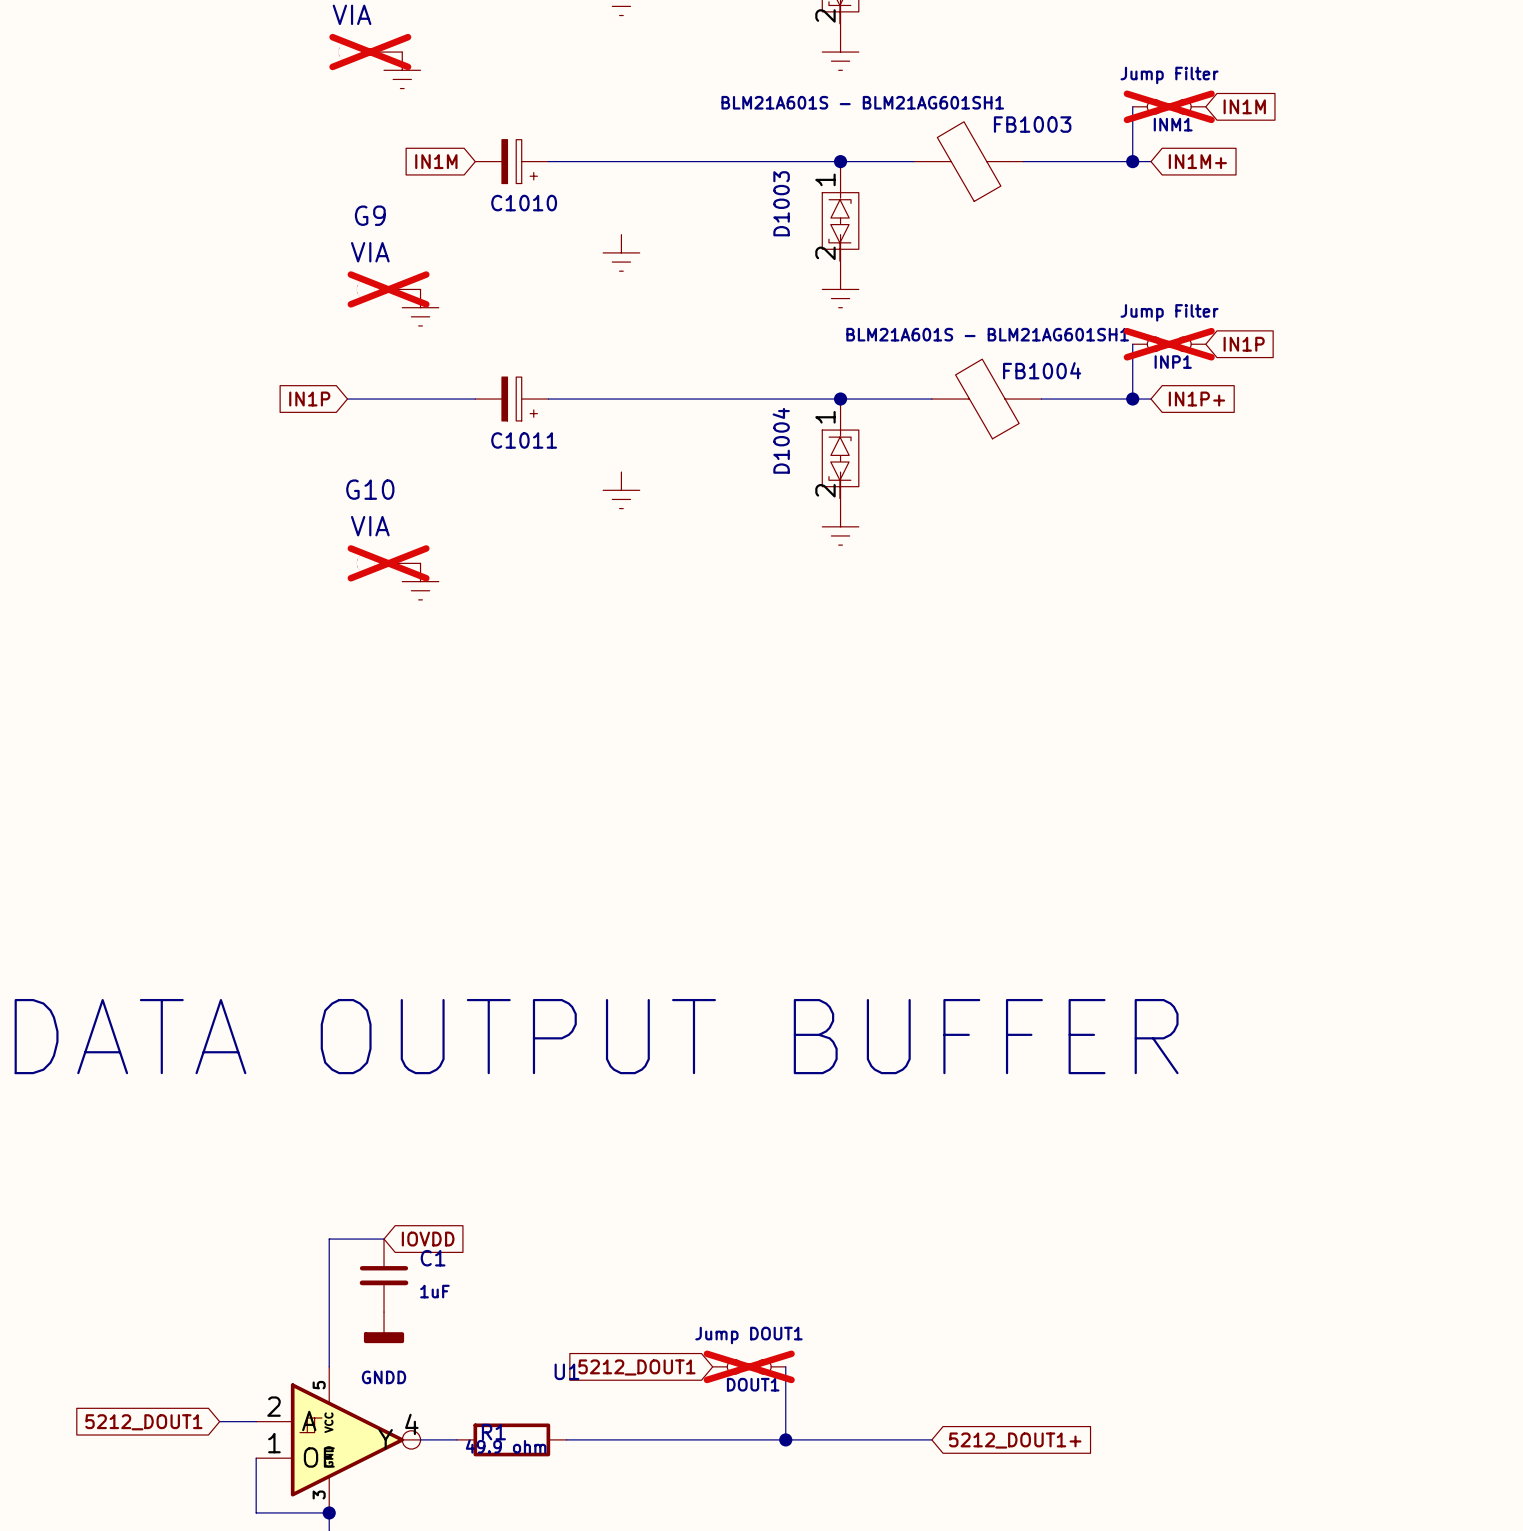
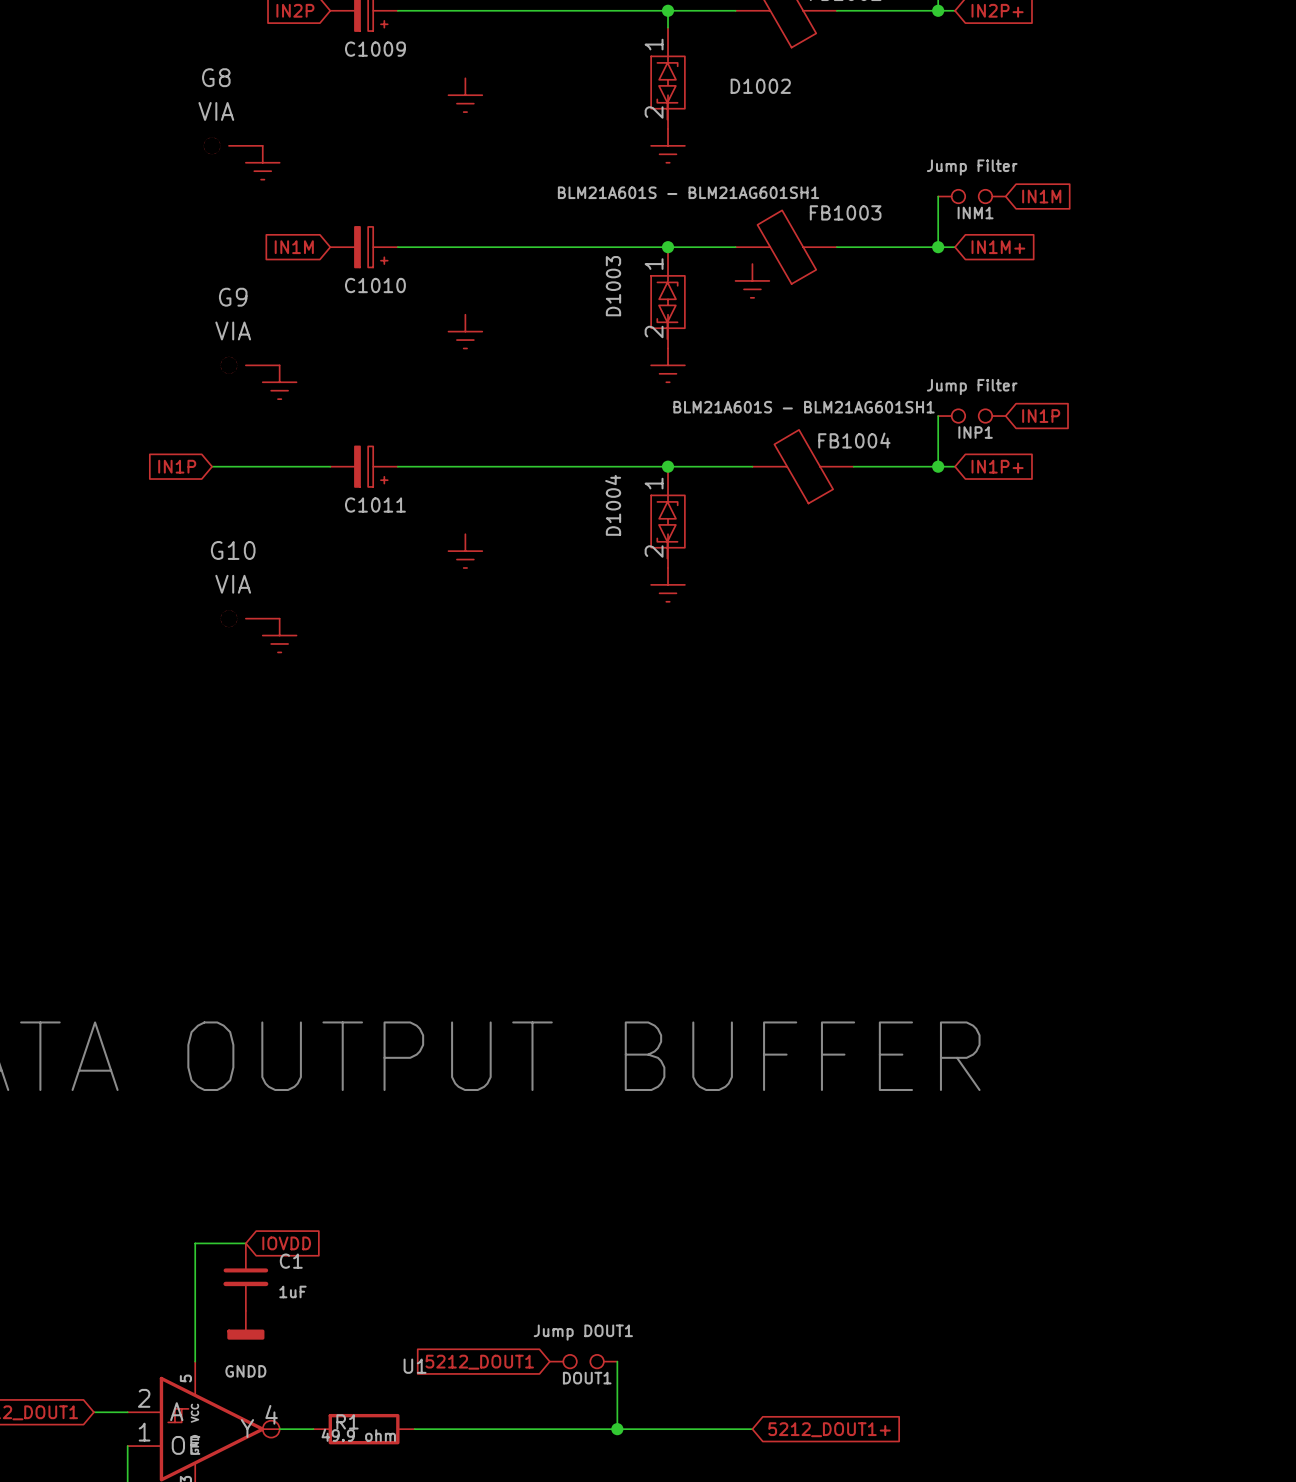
G8 do-not-place cross: (370, 52) -> none
INM1 do-not-place cross: (1169, 106) -> none
power symbol: none -> (752, 280)
G9 do-not-place cross: (388, 289) -> none
INP1 do-not-place cross: (1169, 344) -> none
G10 do-not-place cross: (388, 563) -> none
DOUT1 do-not-place cross: (749, 1366) -> none

